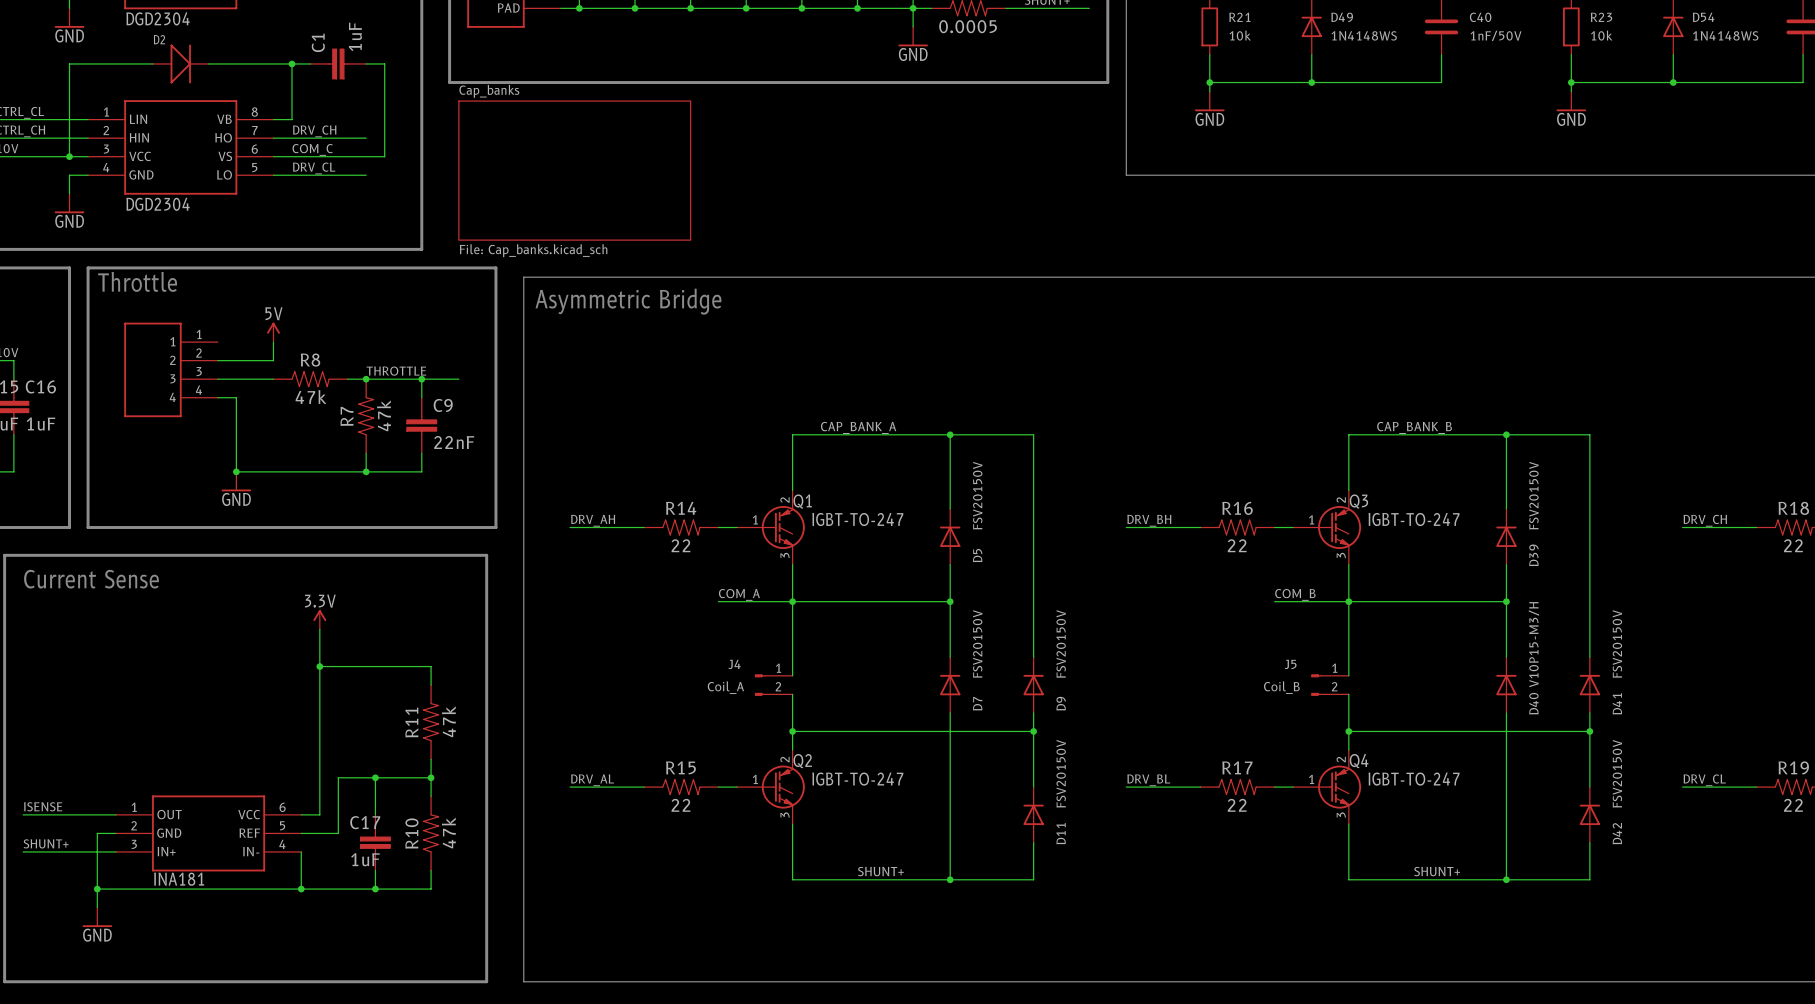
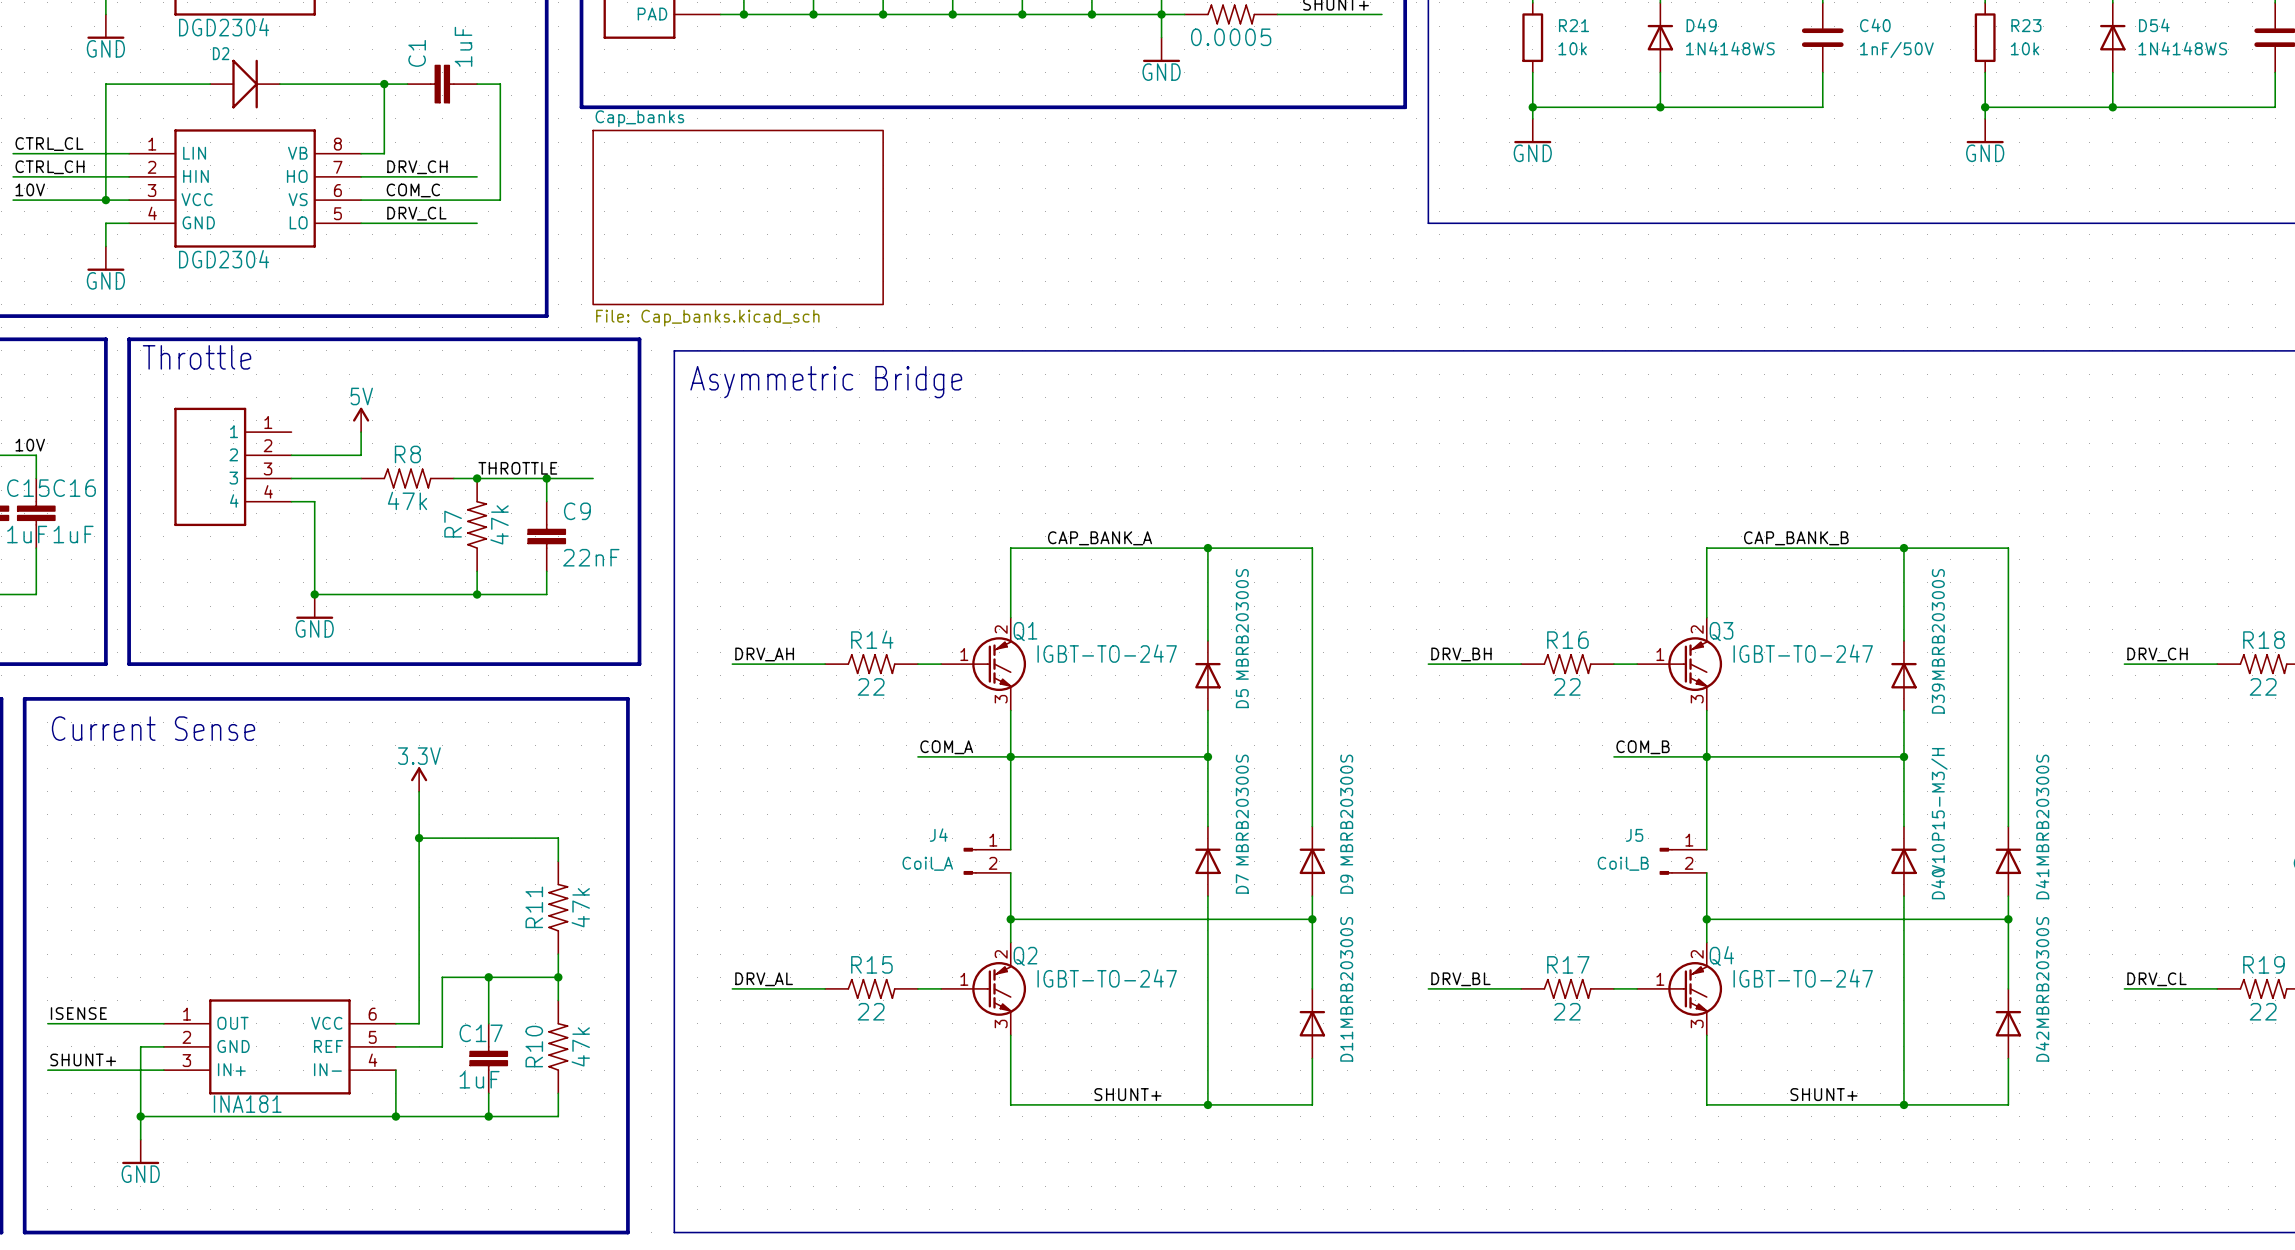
D5 value: FSV20150V (977, 495) -> MBRB20300S (1242, 624)
D39 value: FSV20150V (1533, 495) -> MBRB20300S (1938, 624)
D7 value: FSV20150V (977, 644) -> MBRB20300S (1242, 810)
D9 value: FSV20150V (1061, 644) -> MBRB20300S (1346, 810)
D41 value: FSV20150V (1617, 644) -> MBRB20300S (2042, 810)
D11 value: FSV20150V (1061, 773) -> MBRB20300S (1346, 972)
D42 value: FSV20150V (1617, 773) -> MBRB20300S (2042, 972)

